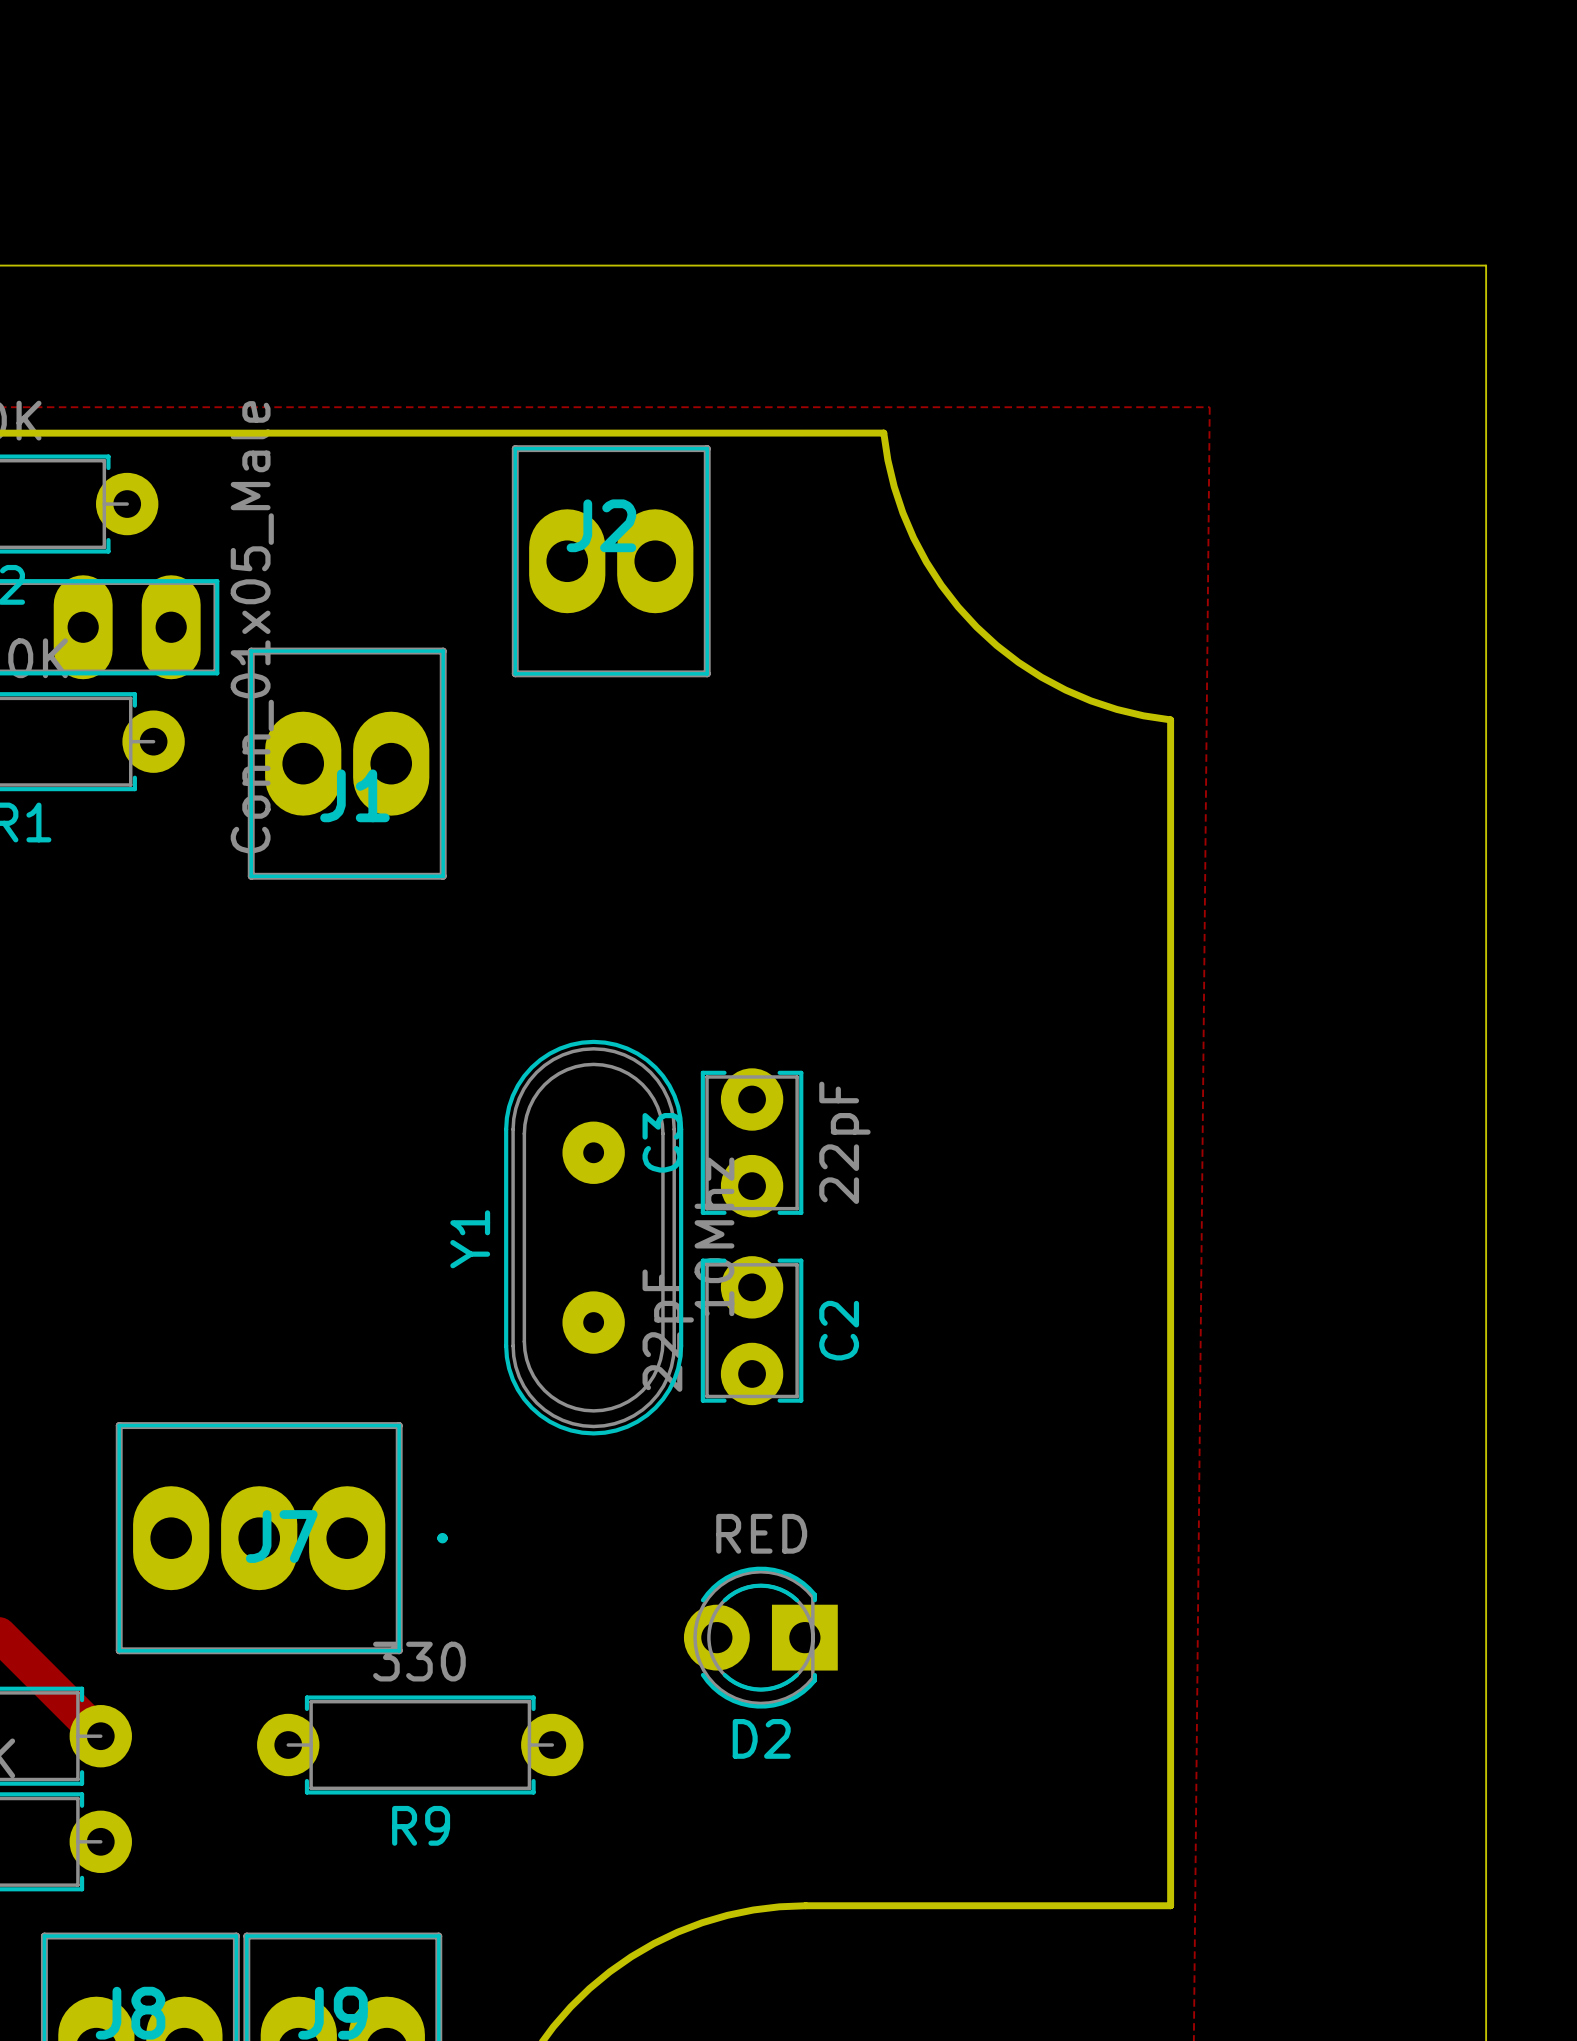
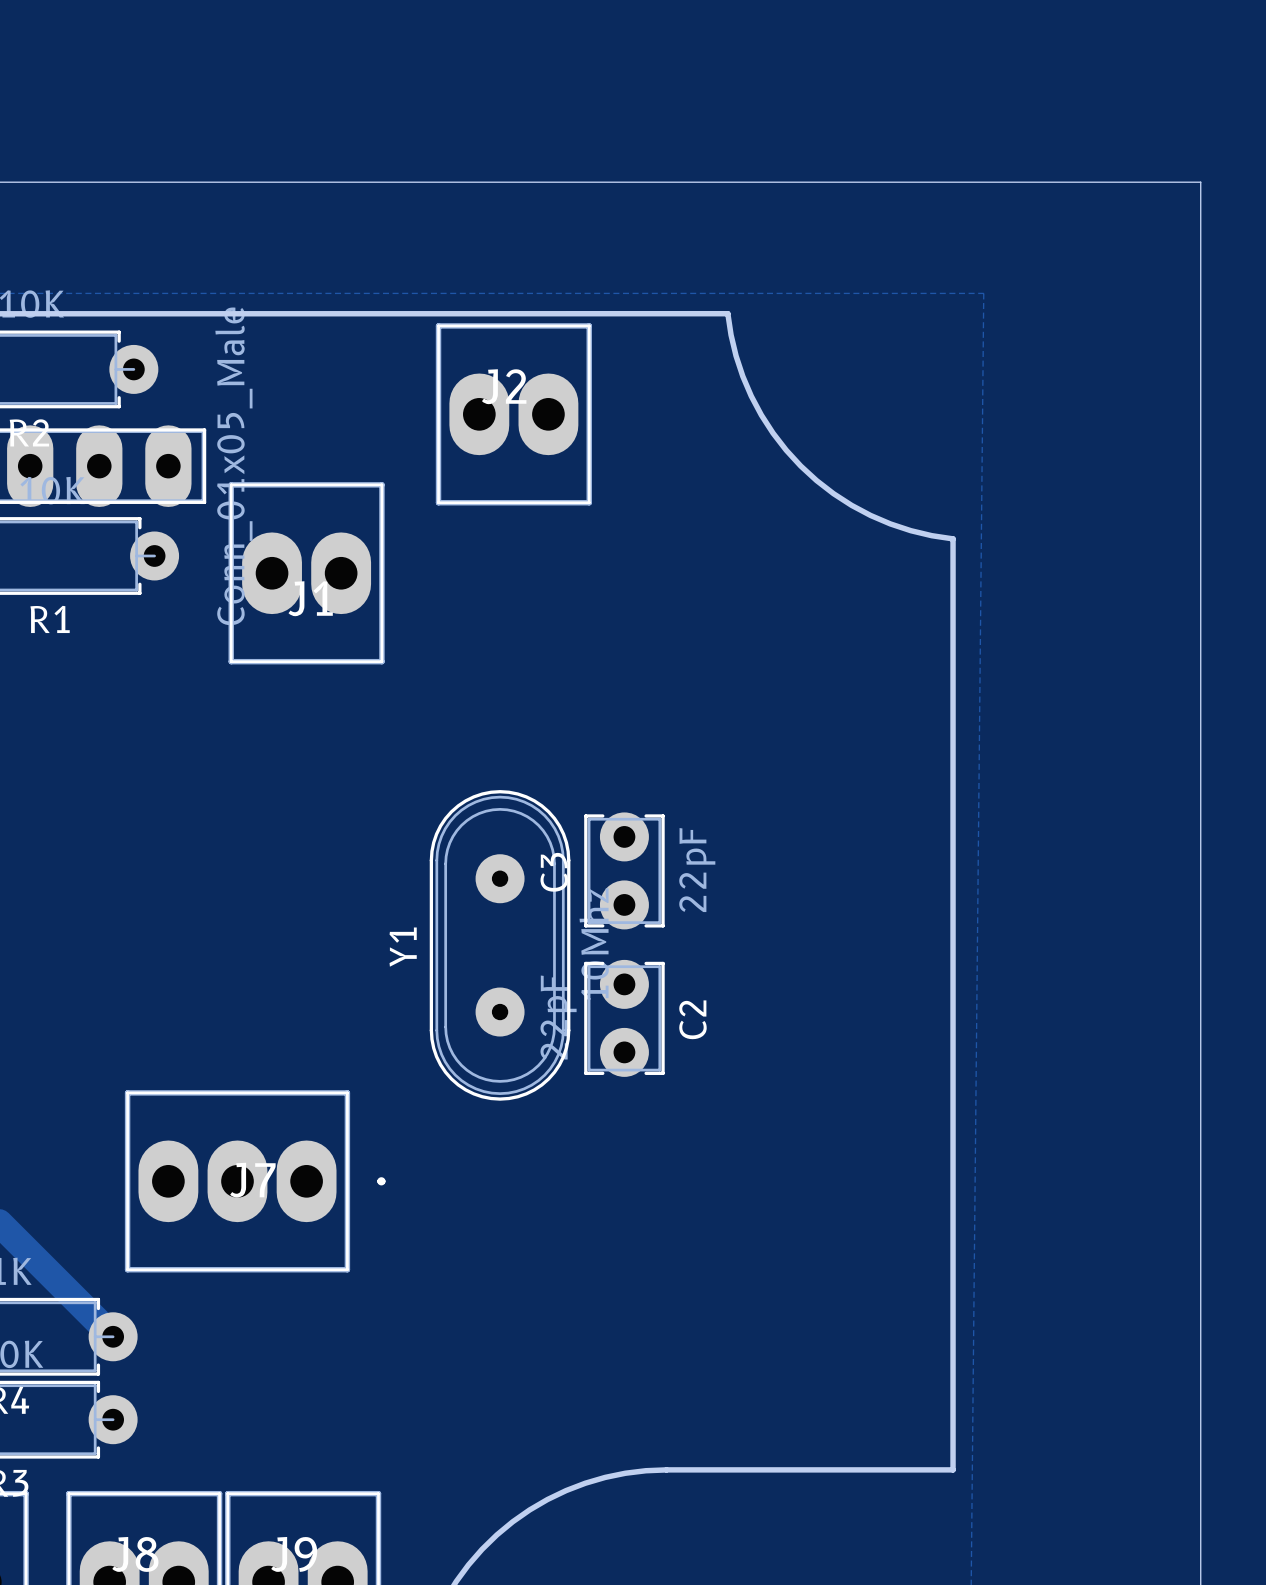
D2: RED (760, 1637) -> none
R9: 330 (420, 1745) -> none

